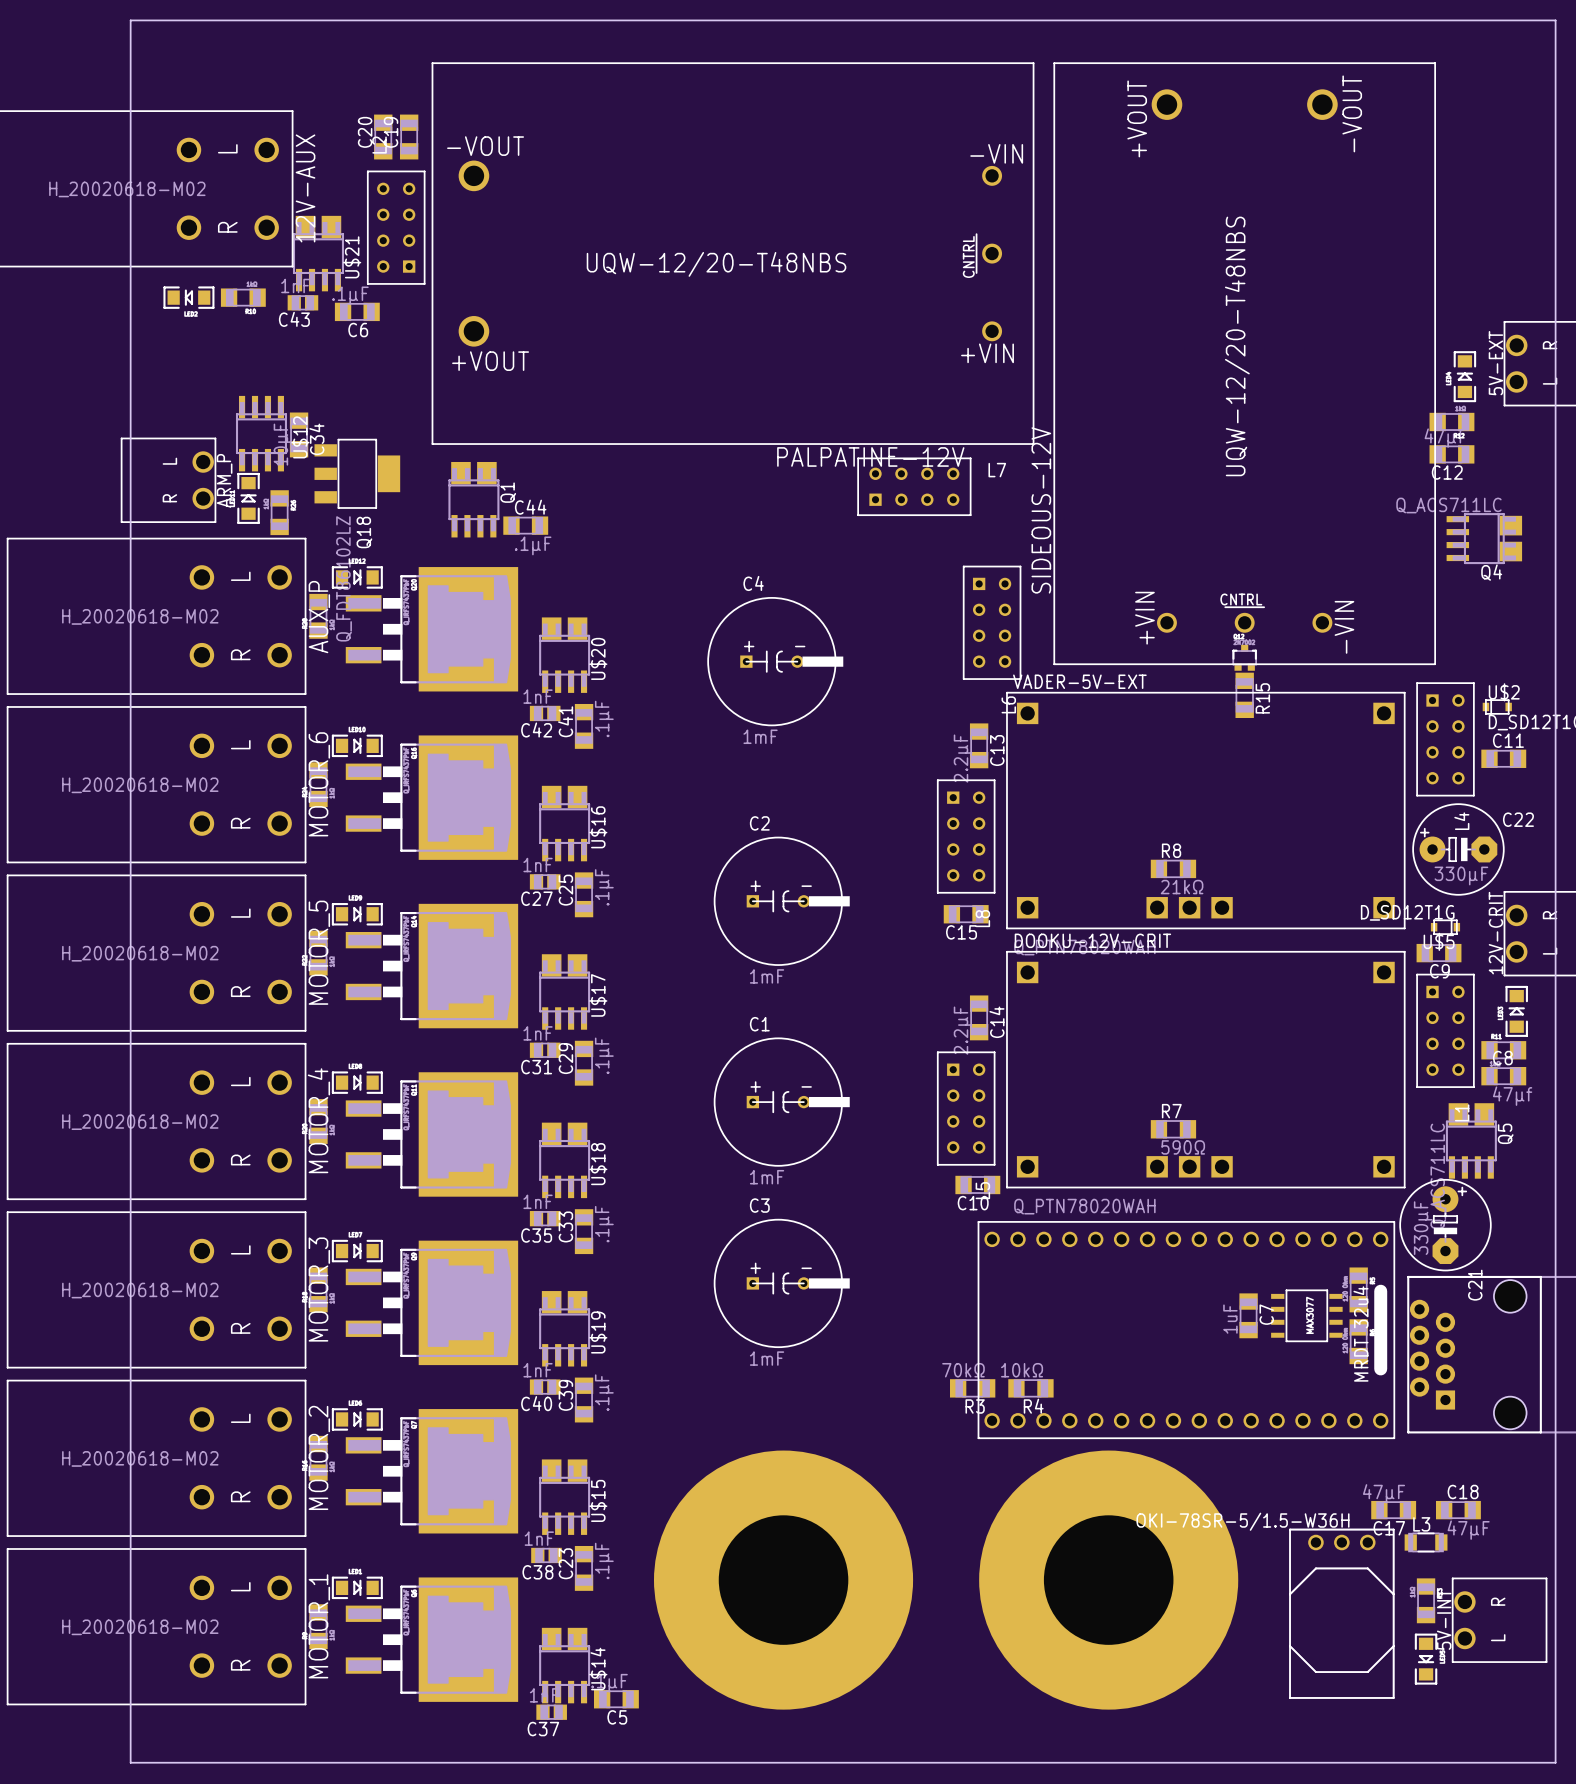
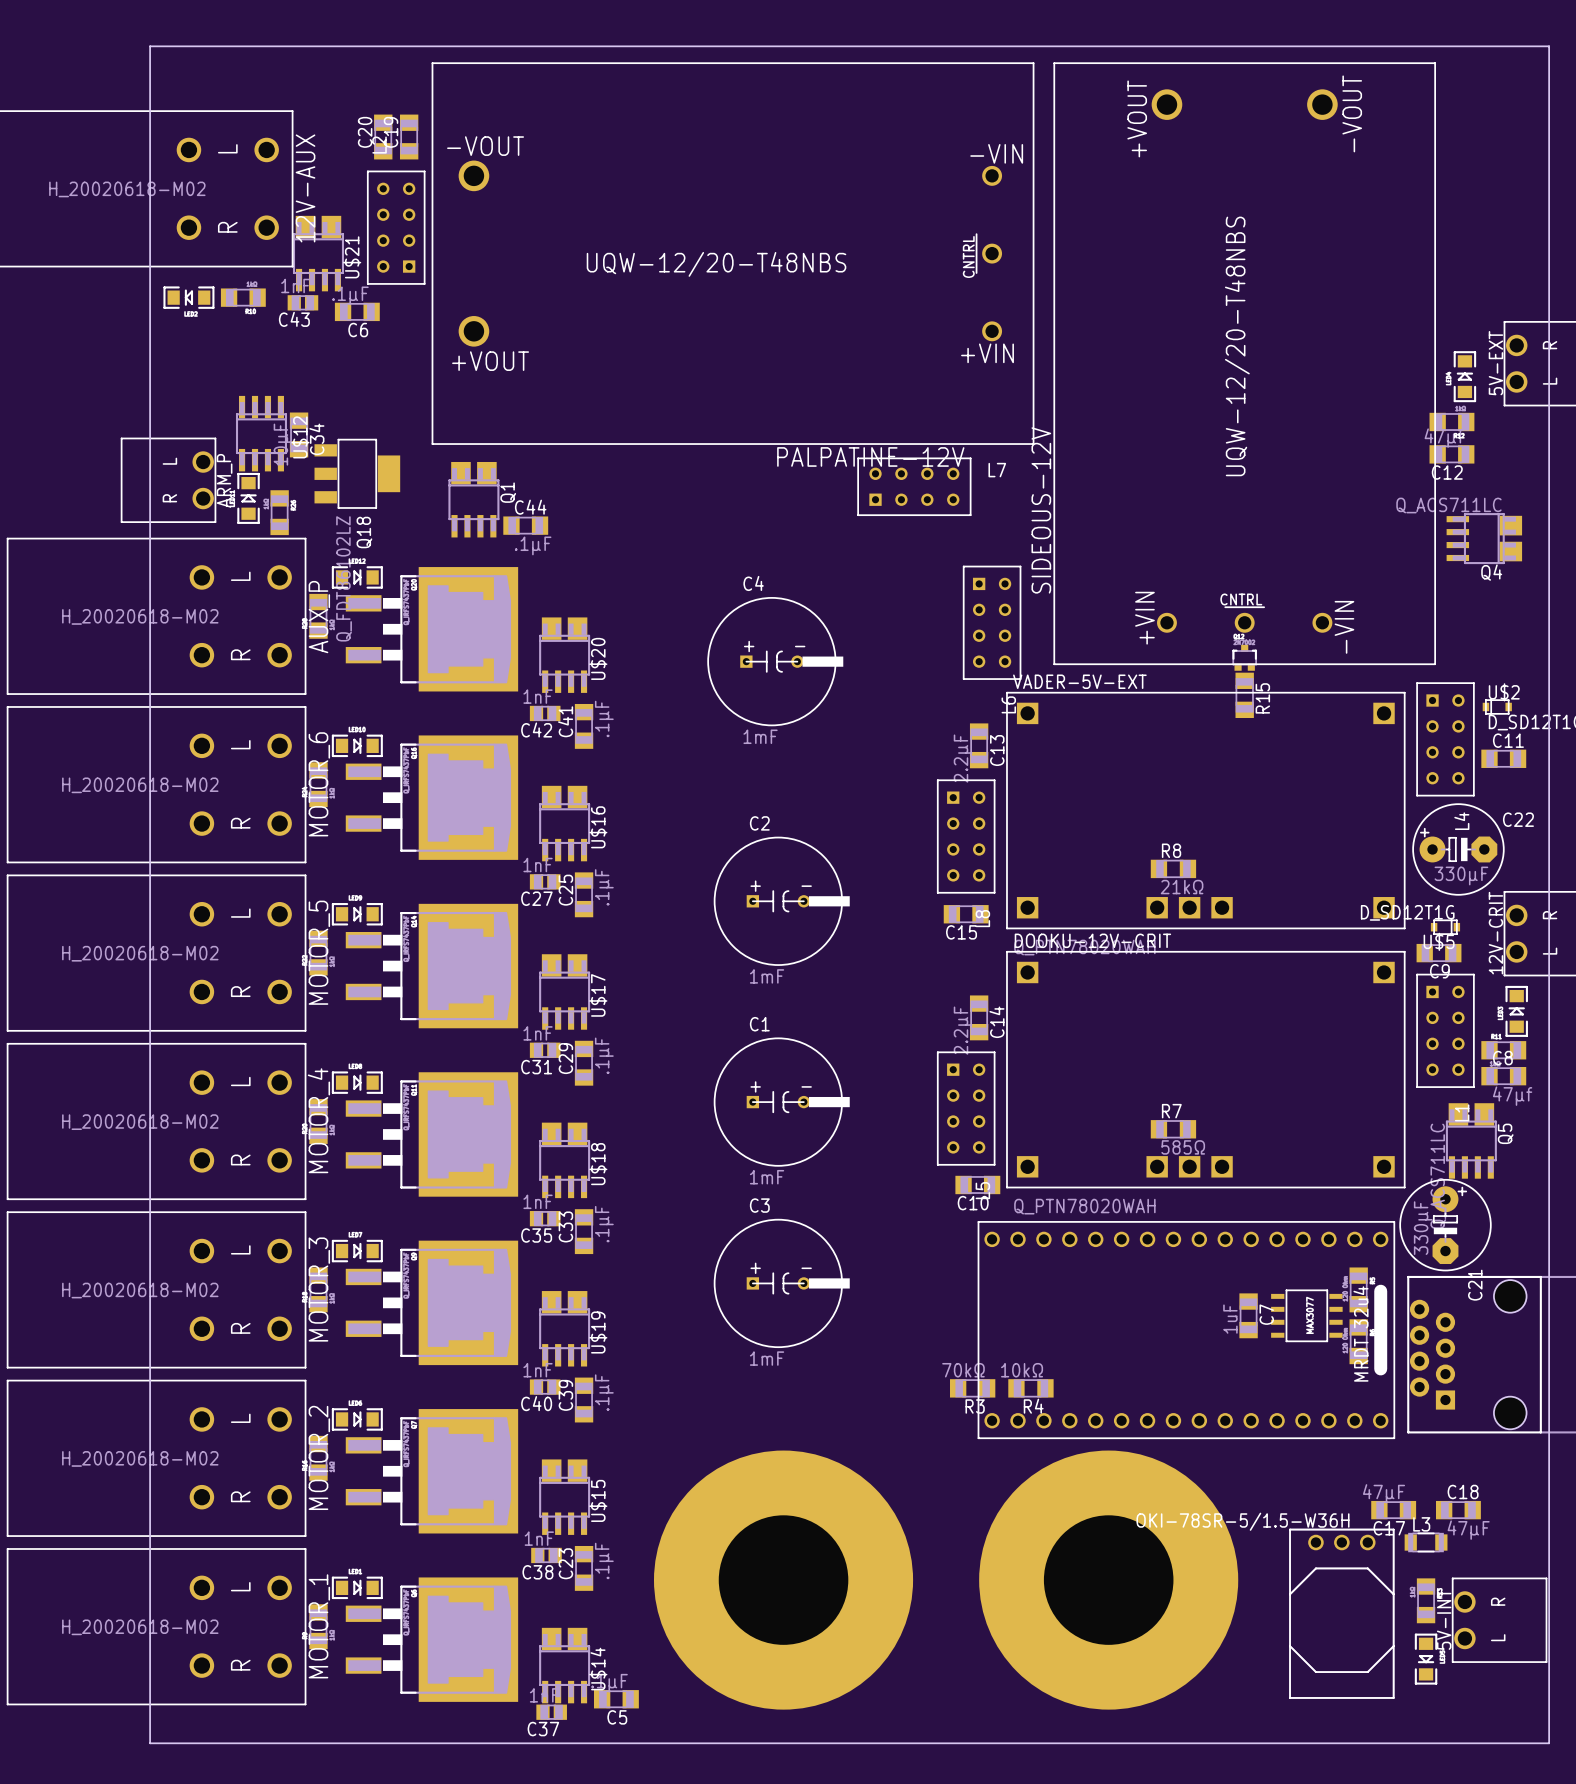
board edge: (130, 20) (1555, 20) (1555, 1762) (130, 1762) (130, 20) -> (150, 46) (150, 1743) (1549, 1743) (1549, 46) (150, 46)
R7 value: 590Ω (1183, 1147) -> 585Ω (1183, 1147)

